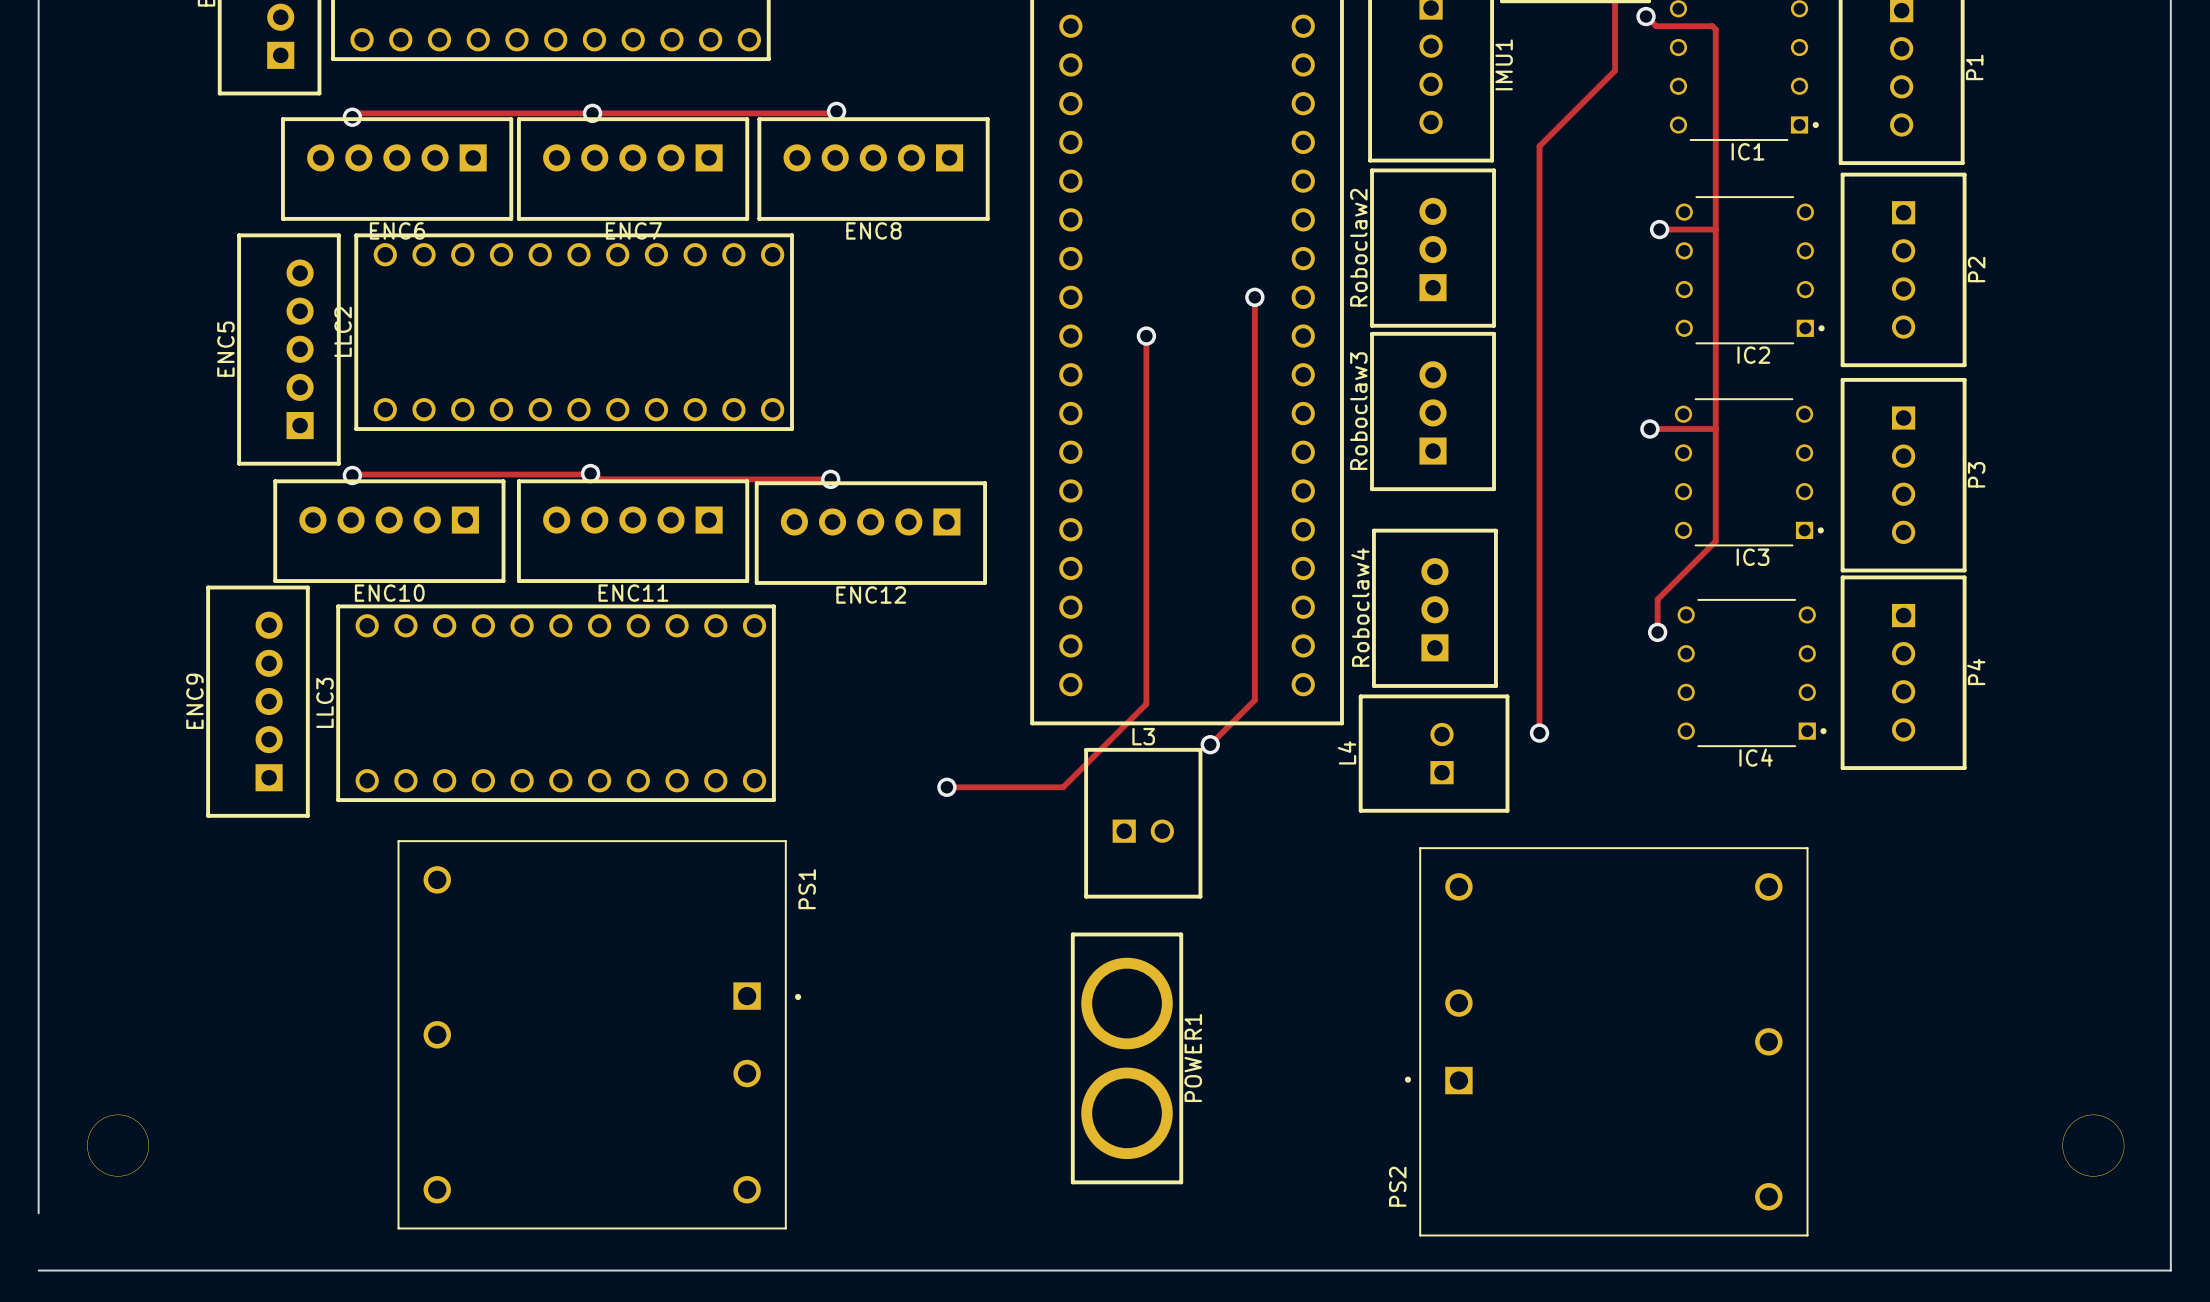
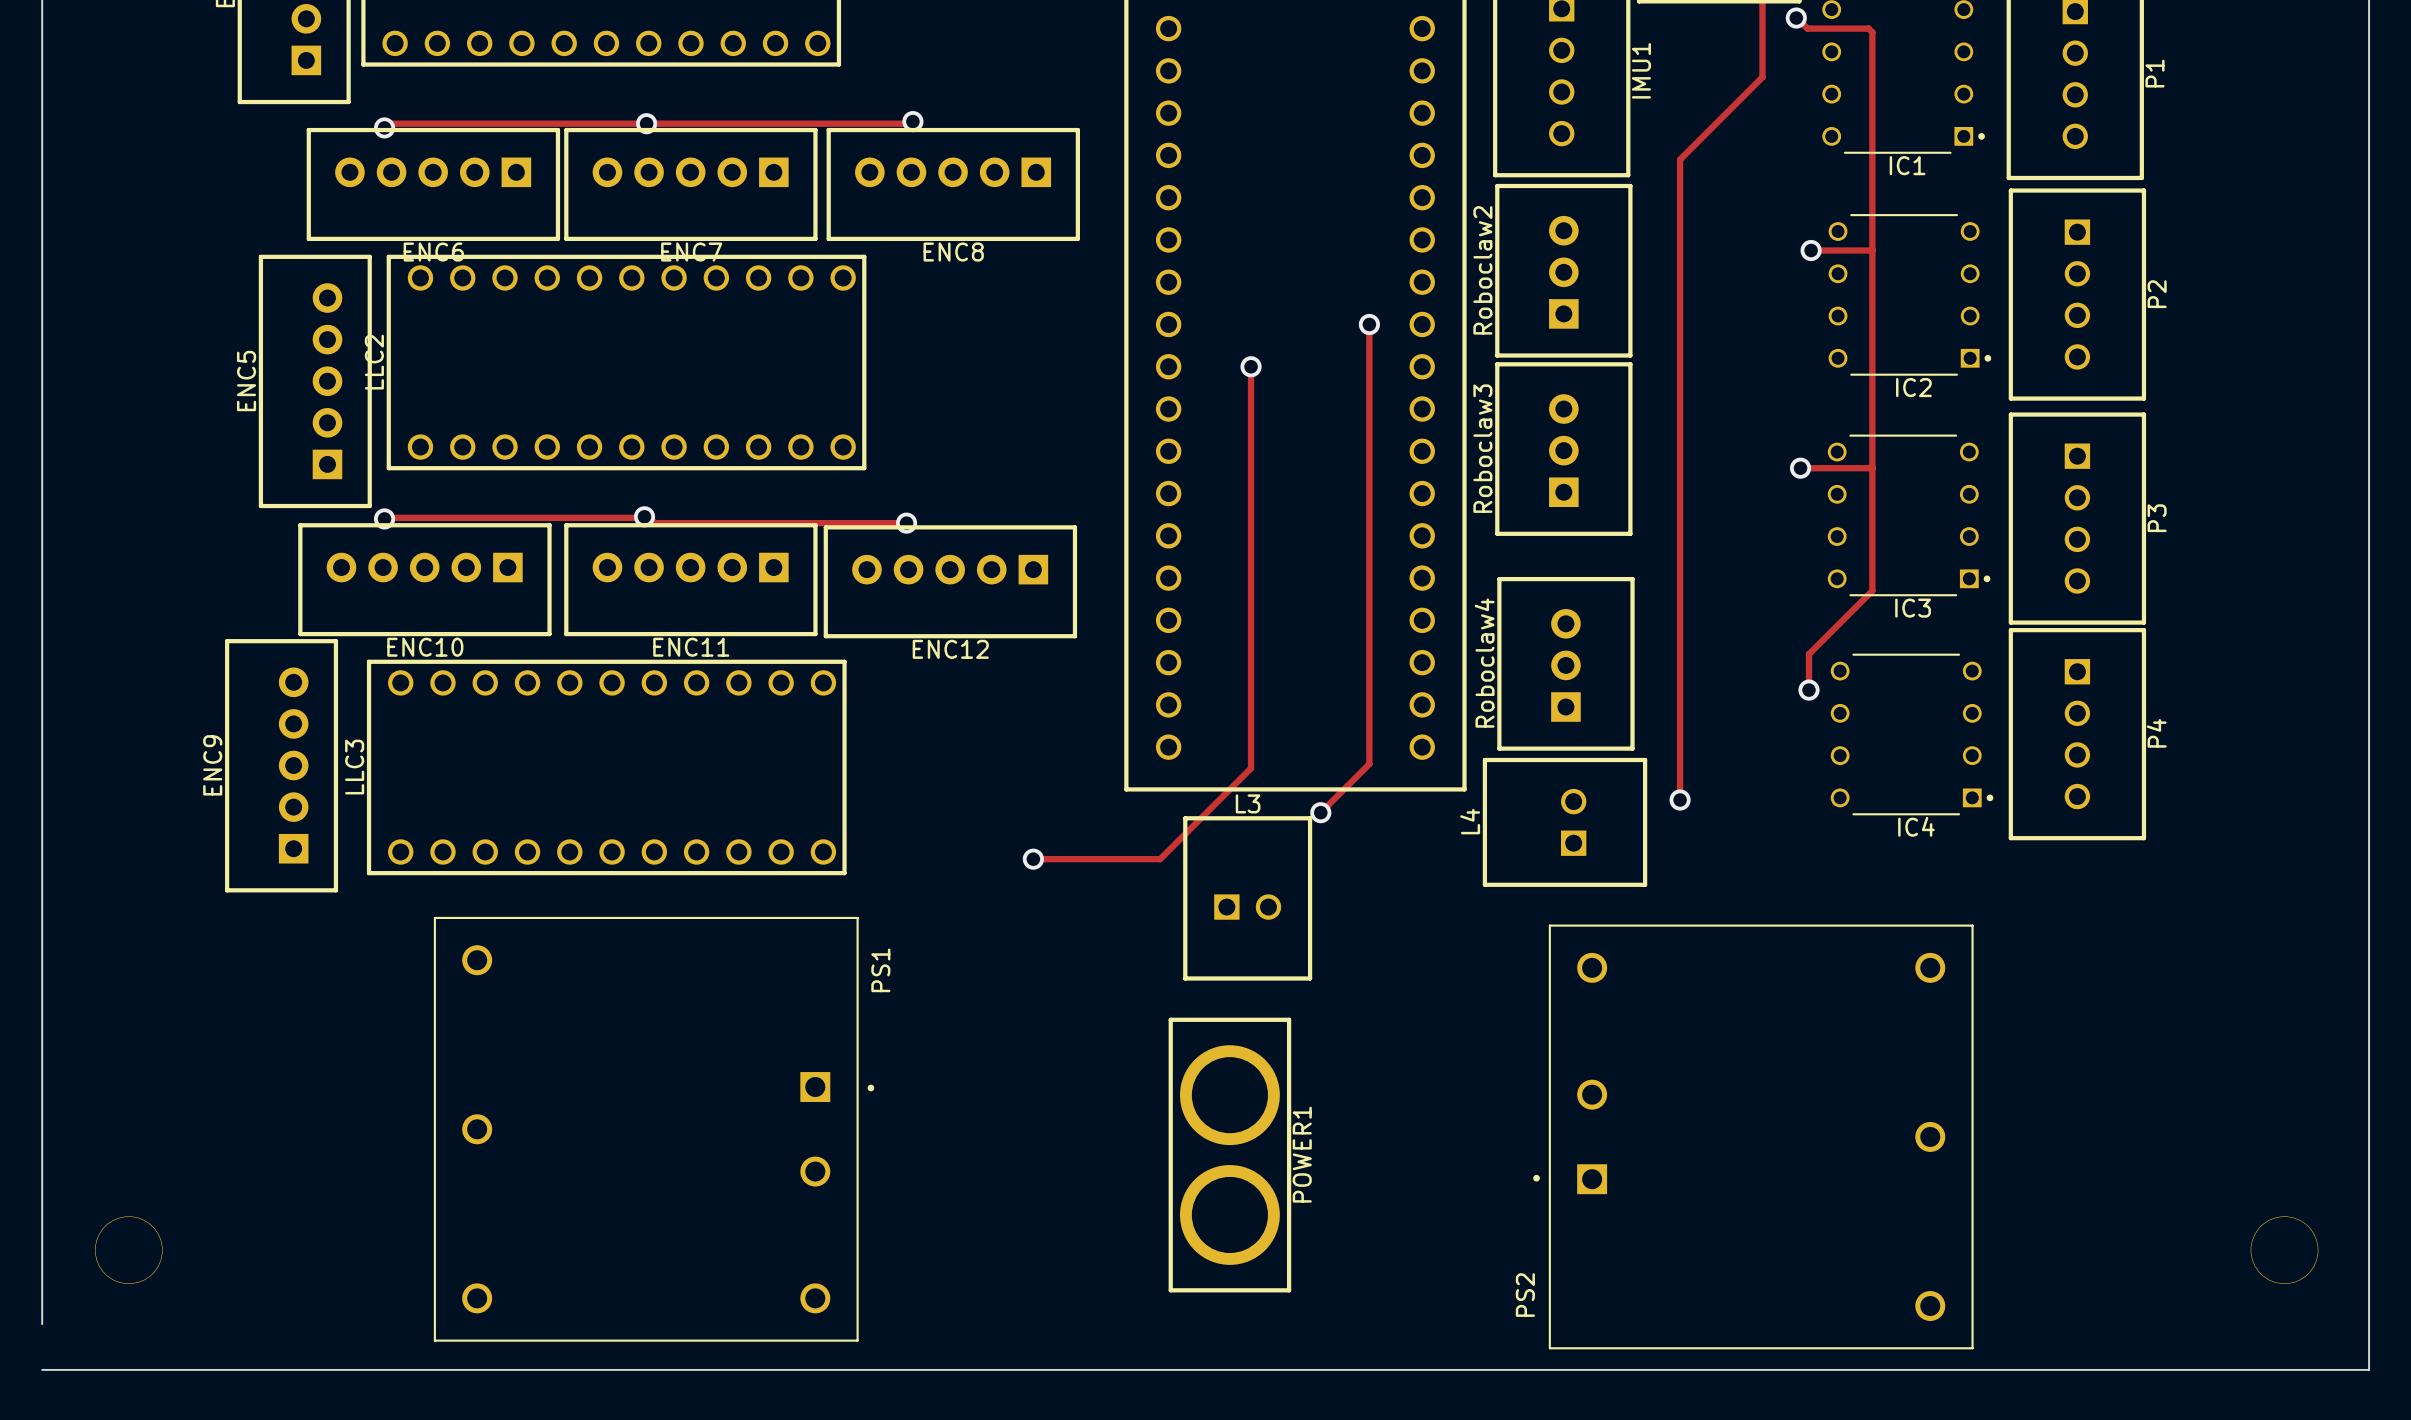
board edge: (2170, 1255) (2170, 1270) (38, 1270) -> (2369, 1369) (42, 1369)

